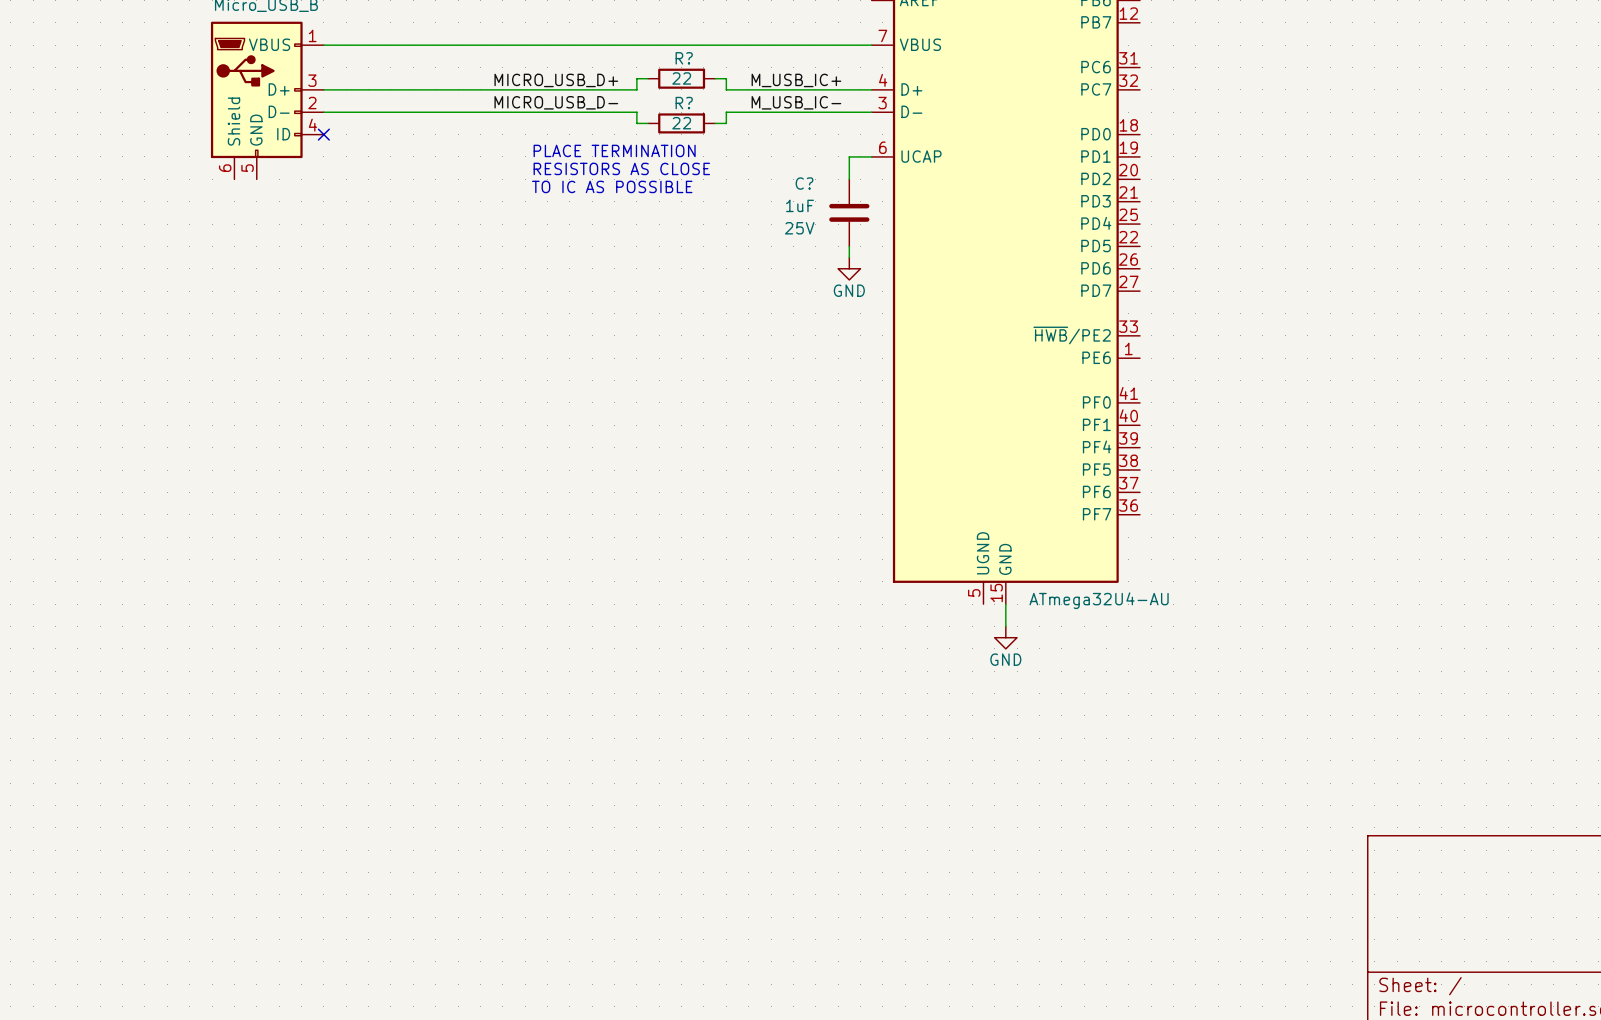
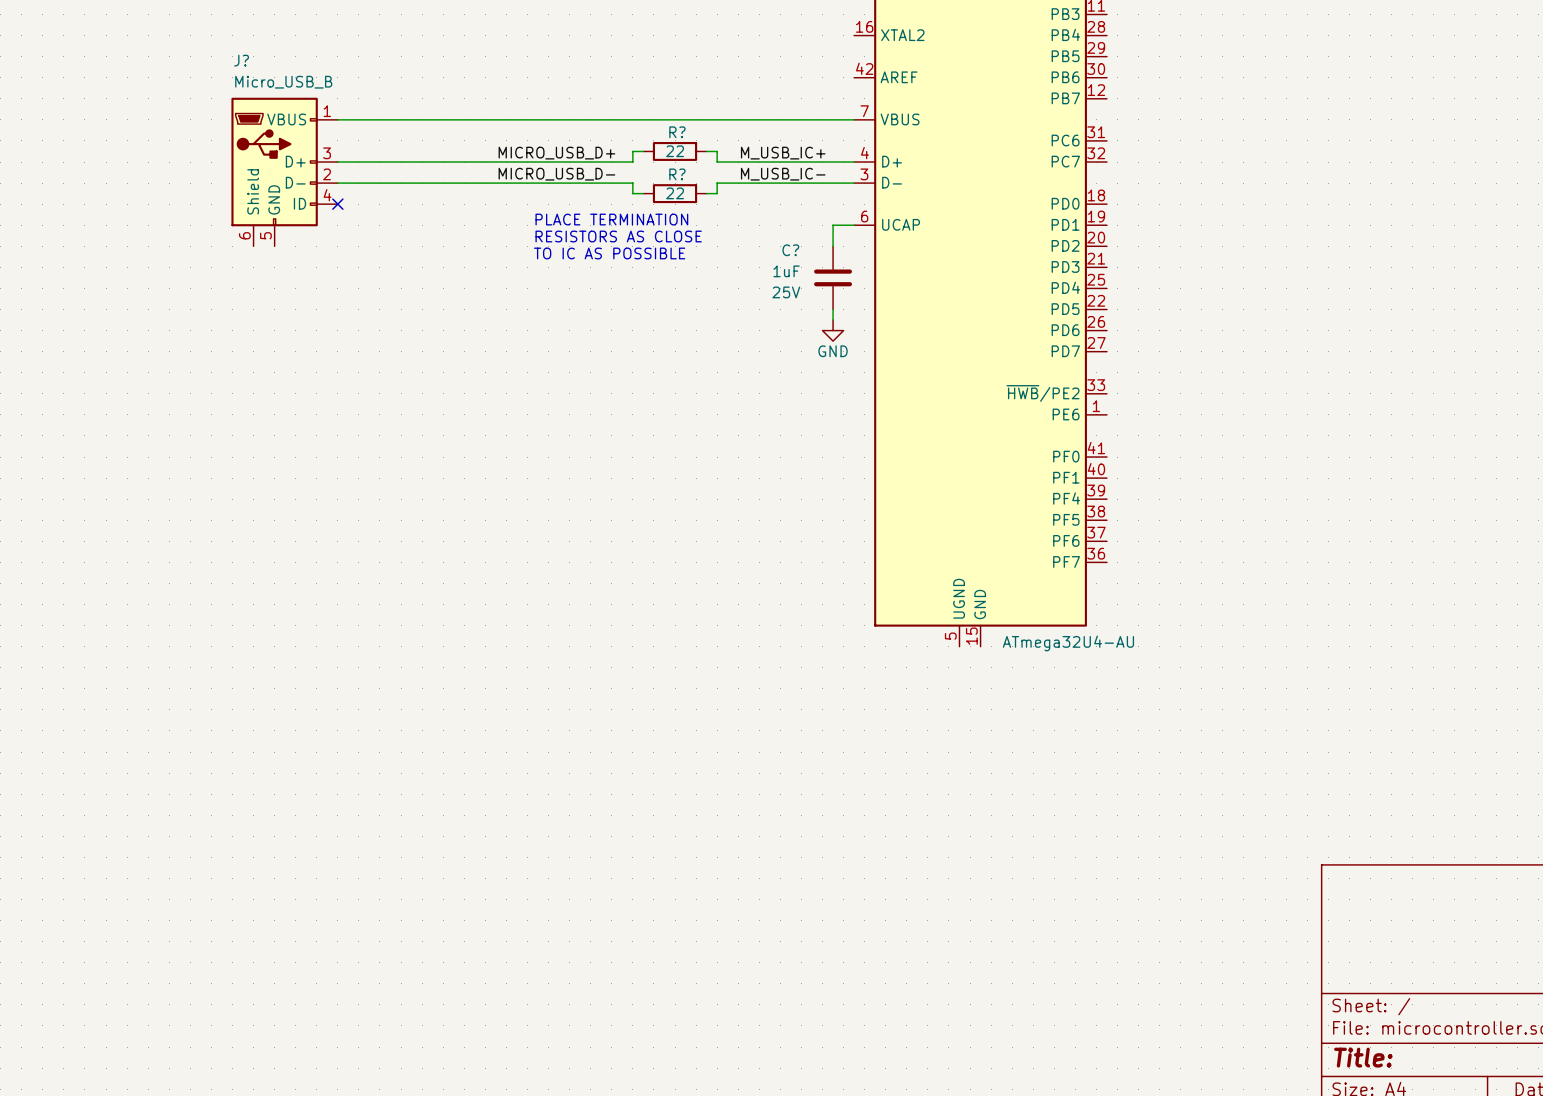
wire: (1005, 604) (1005, 626) -> none
power symbol: GND (1005, 637) -> none

